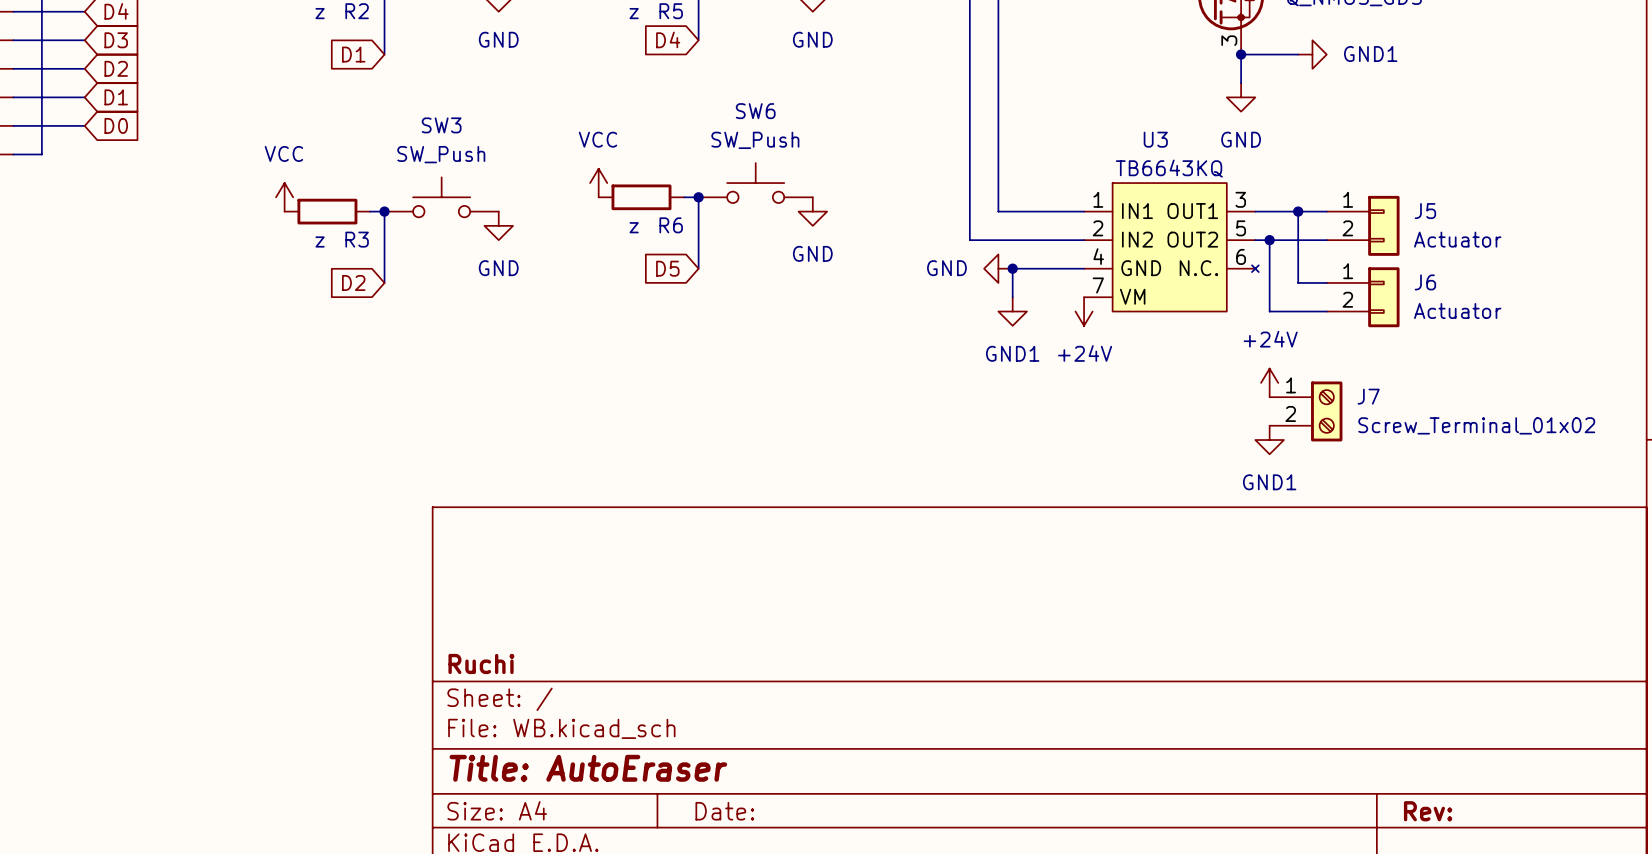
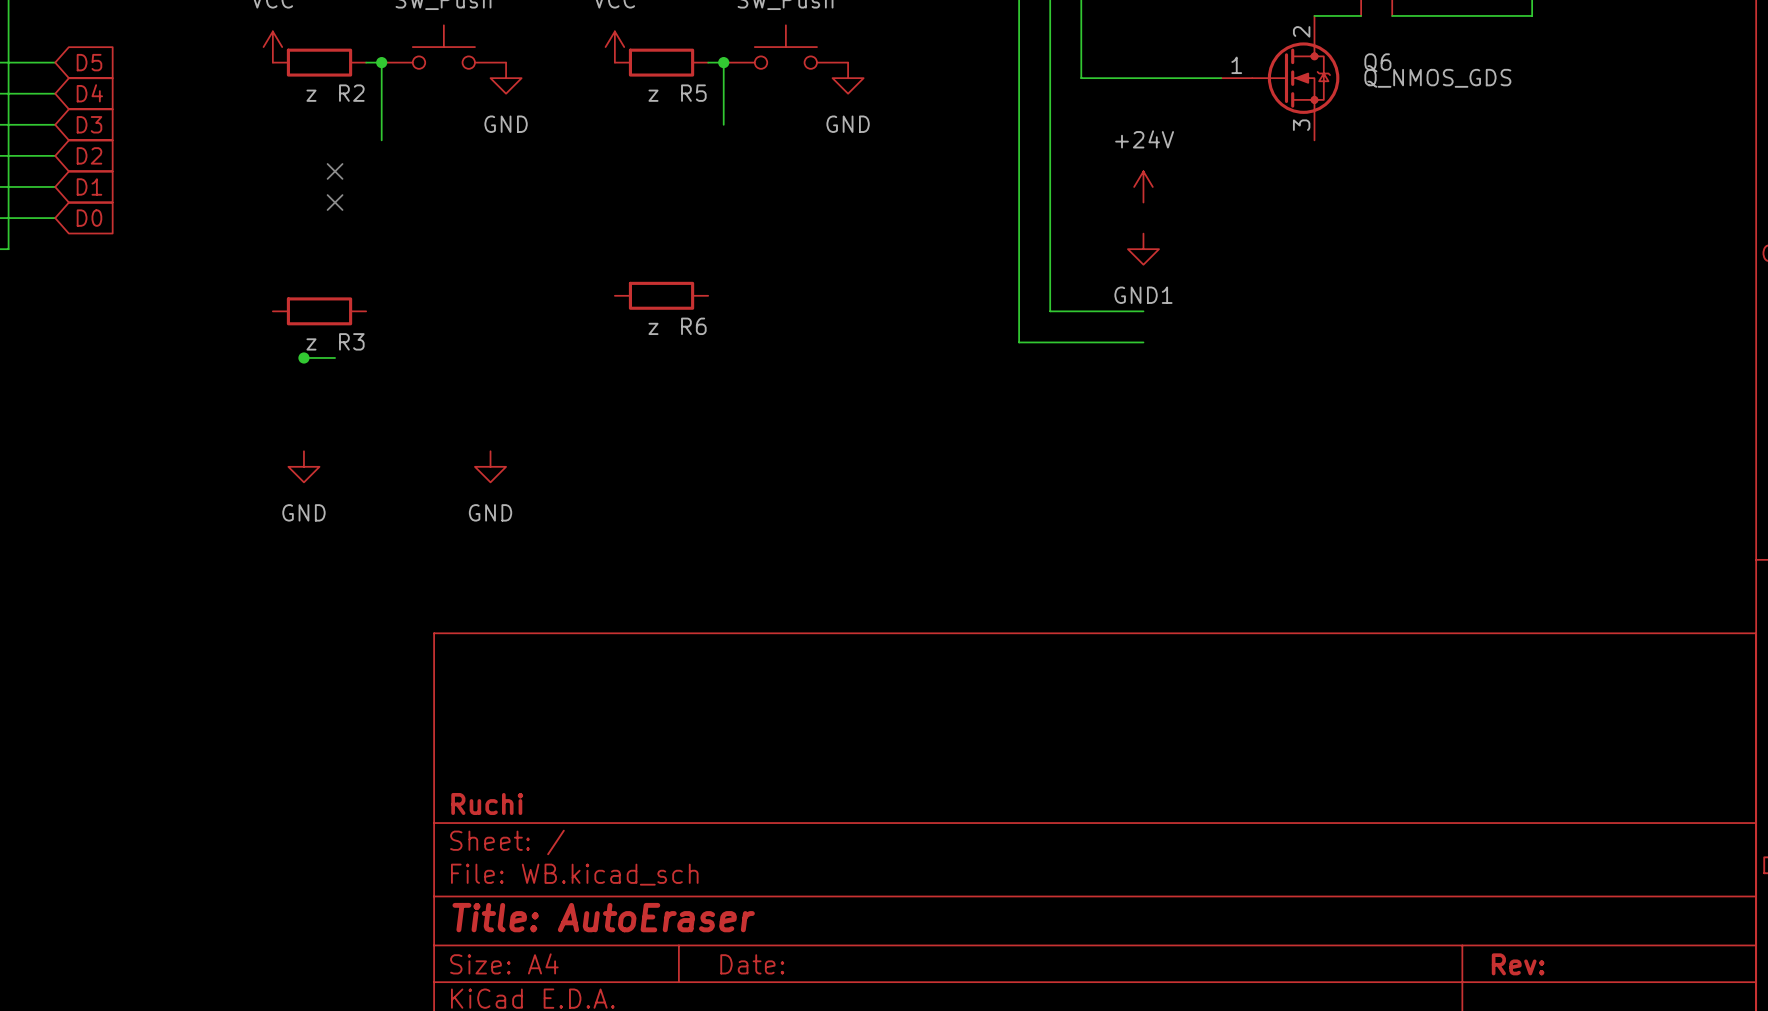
global label: D4 (668, 39) -> none
global label: D1 (353, 54) -> none
junction: (1241, 54) -> none
wire: (1298, 54) (1241, 54) (1241, 83) -> none
power symbol: GND1 (1312, 54) -> none
no-connect mark: none -> (335, 171)
power symbol: none -> +24V (1143, 186)
power symbol: GND (1241, 97) -> none
no-connect mark: none -> (335, 202)
power symbol: none -> GND1 (1143, 249)
power symbol: VCC (598, 183) -> none
SW6: SW_Push (755, 183) -> none
power symbol: VCC (284, 197) -> none
SW3: SW_Push (441, 197) -> none
wire: (684, 197) (698, 197) (698, 268) -> none
junction: (698, 197) -> none
wire: (370, 211) (384, 211) (384, 282) -> none
junction: (384, 211) -> none
power symbol: GND (812, 211) -> none
wire: (1255, 211) (1326, 211) -> none
wire: (1298, 211) (1298, 282) (1326, 282) -> none
junction: (1298, 211) -> none
power symbol: GND (498, 225) -> none
J5: Actuator (1363, 225) -> none
wire: (1255, 240) (1326, 240) -> none
wire: (1269, 240) (1269, 311) (1326, 311) -> none
junction: (1269, 240) -> none
U3: TB6643KQ (1171, 247) -> none
wire: none -> (303, 357) (335, 357)
junction: none -> (303, 357)
global label: D5 (667, 268) -> none
power symbol: GND (998, 268) -> none
junction: (1012, 268) -> none
wire: (1084, 268) (1012, 268) (1012, 297) -> none
global label: D2 (353, 282) -> none
J6: Actuator (1363, 297) -> none
power symbol: GND1 (1012, 311) -> none
power symbol: +24V (1084, 311) -> none
power symbol: none -> GND (303, 466)
power symbol: none -> GND (490, 466)
power symbol: +24V (1269, 382) -> none
J7: Screw_Terminal_01x02 (1306, 411) -> none
power symbol: GND1 (1269, 440) -> none

